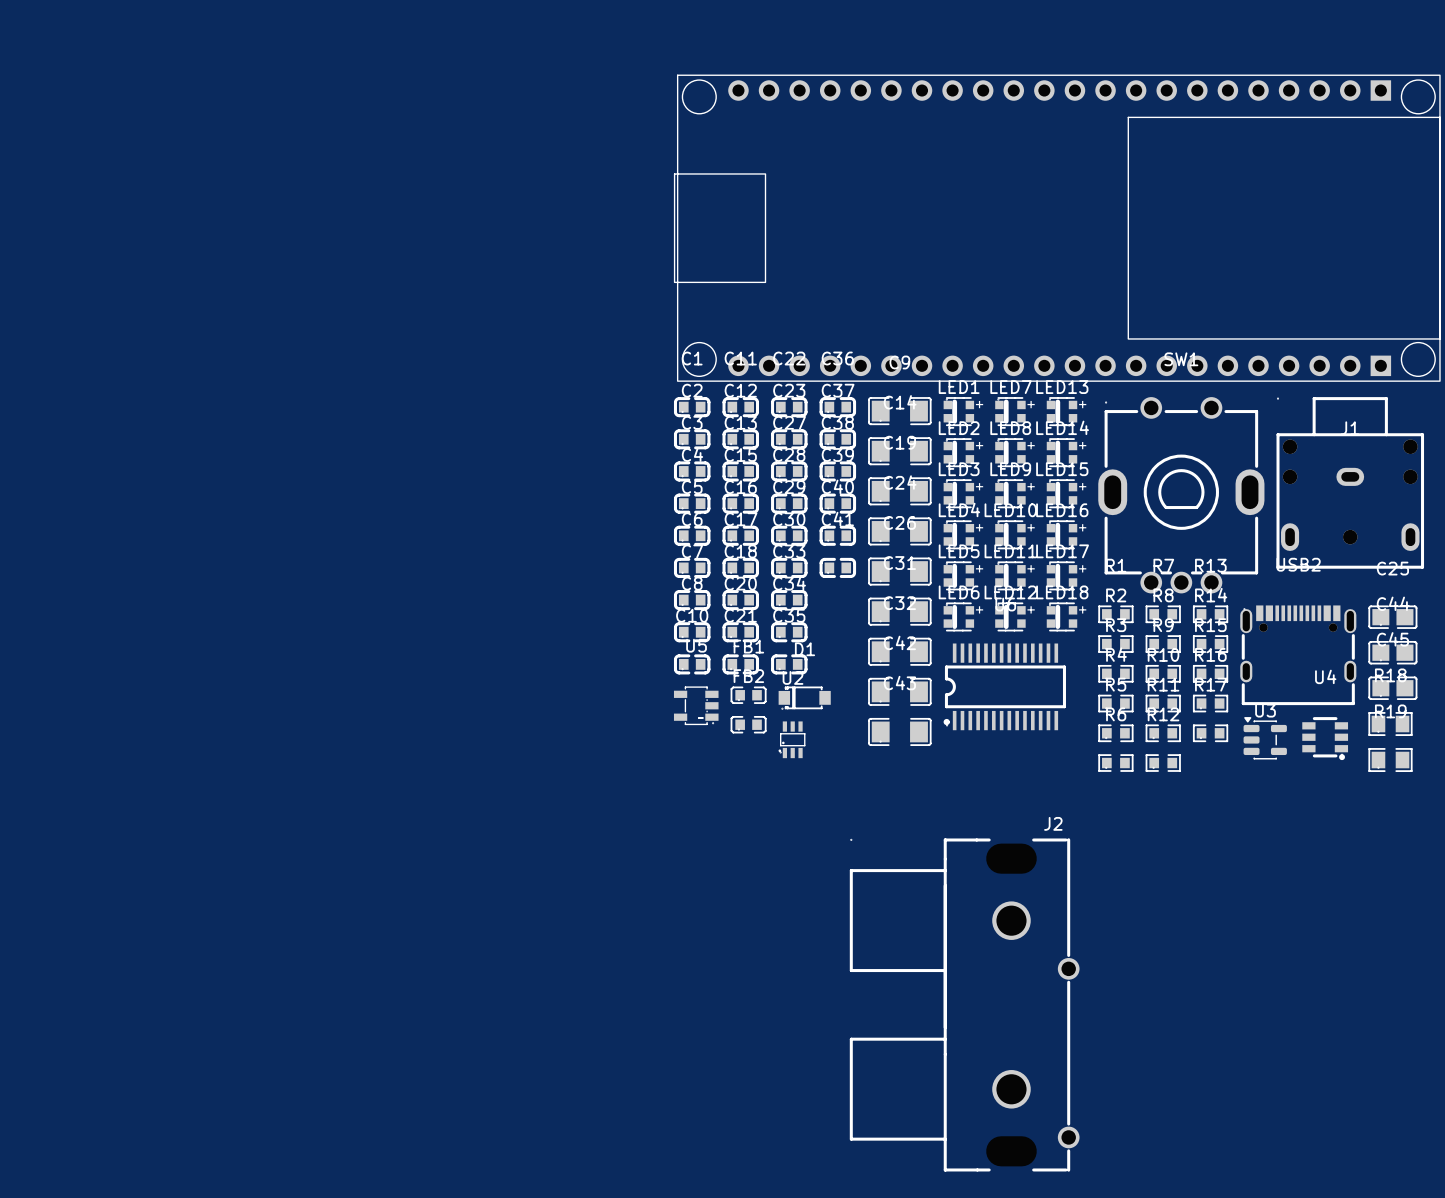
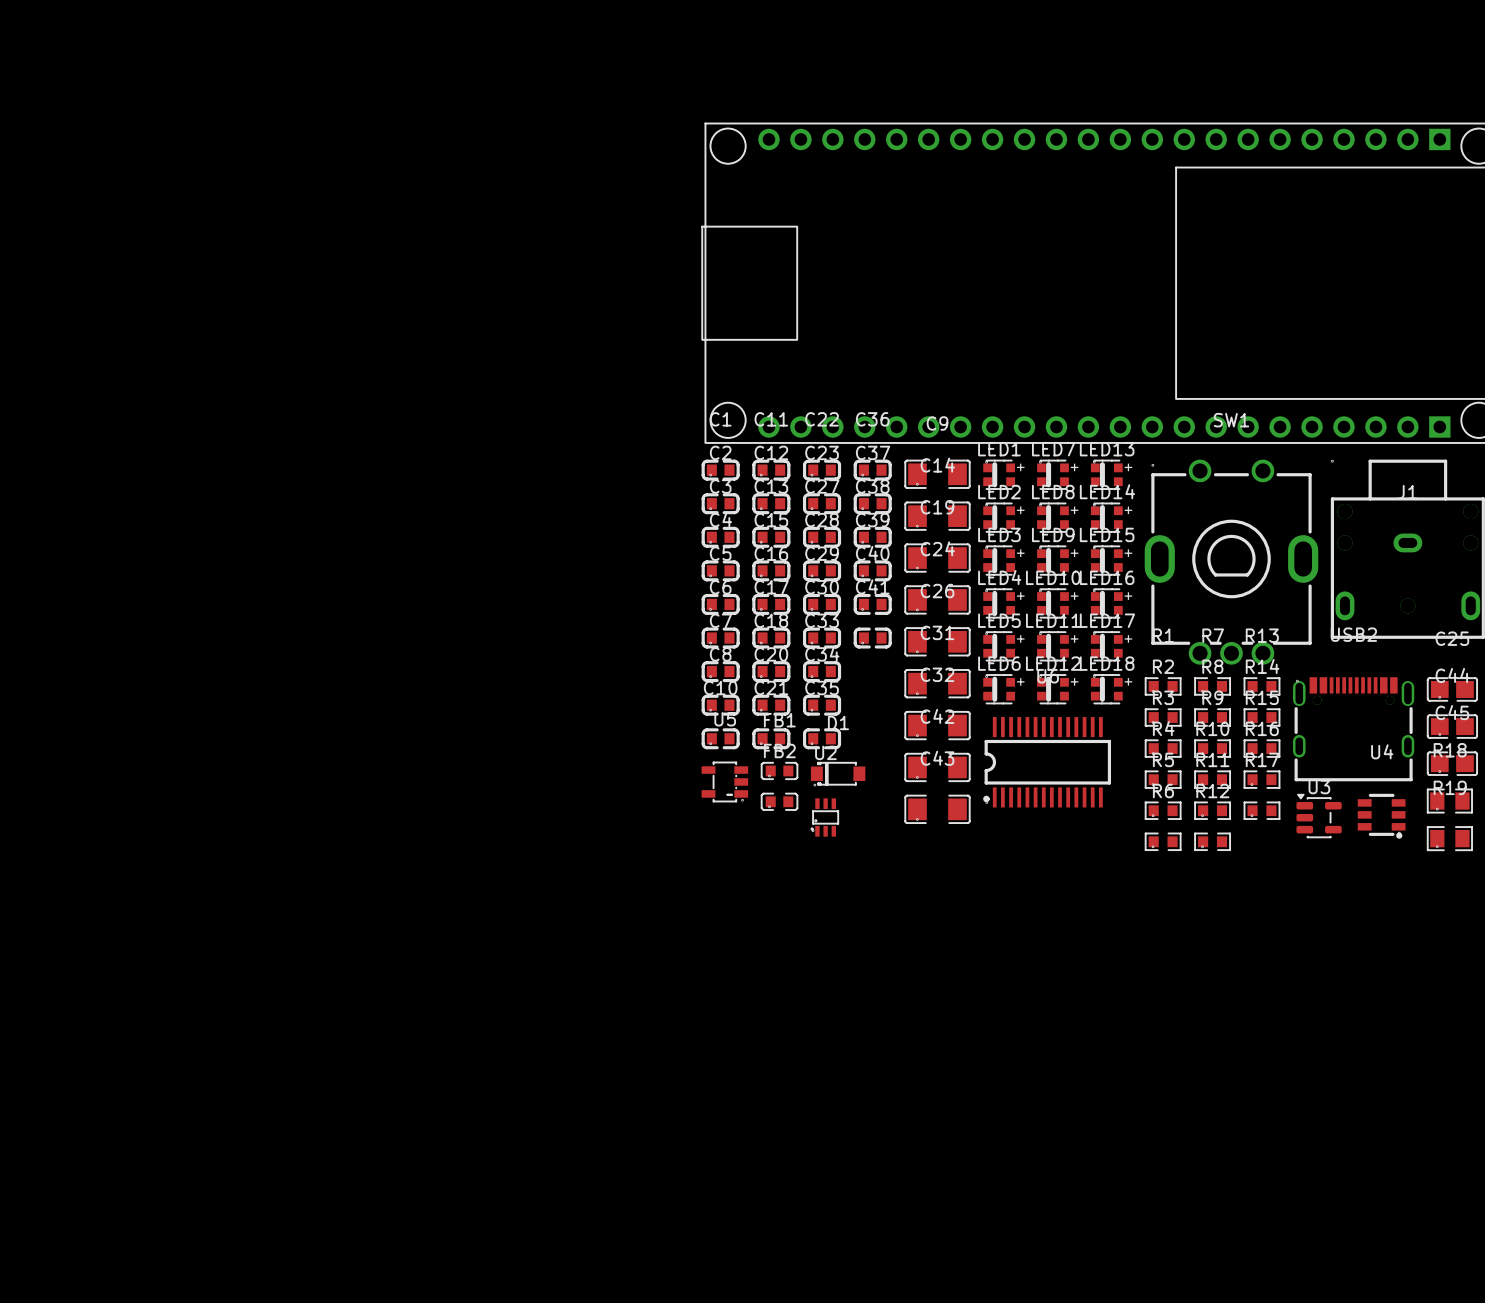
J2: (964, 1004) -> none

